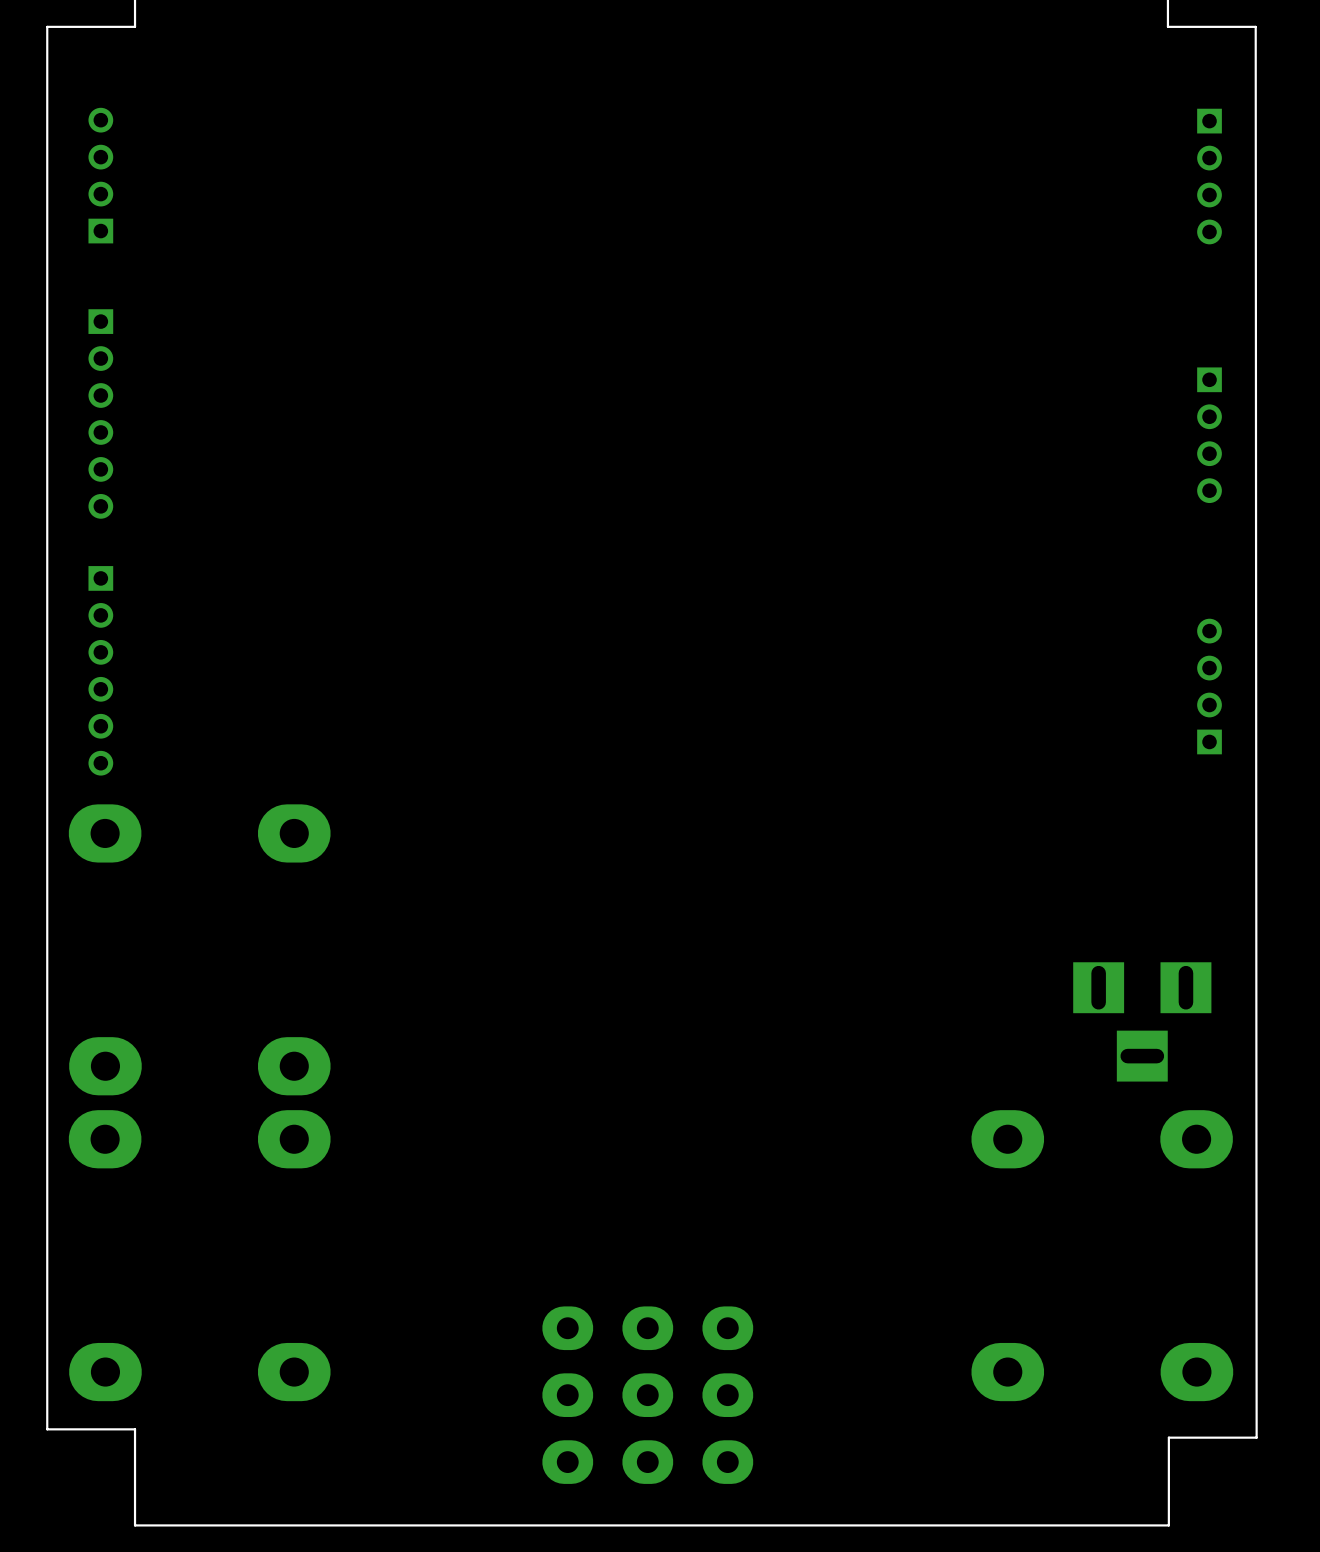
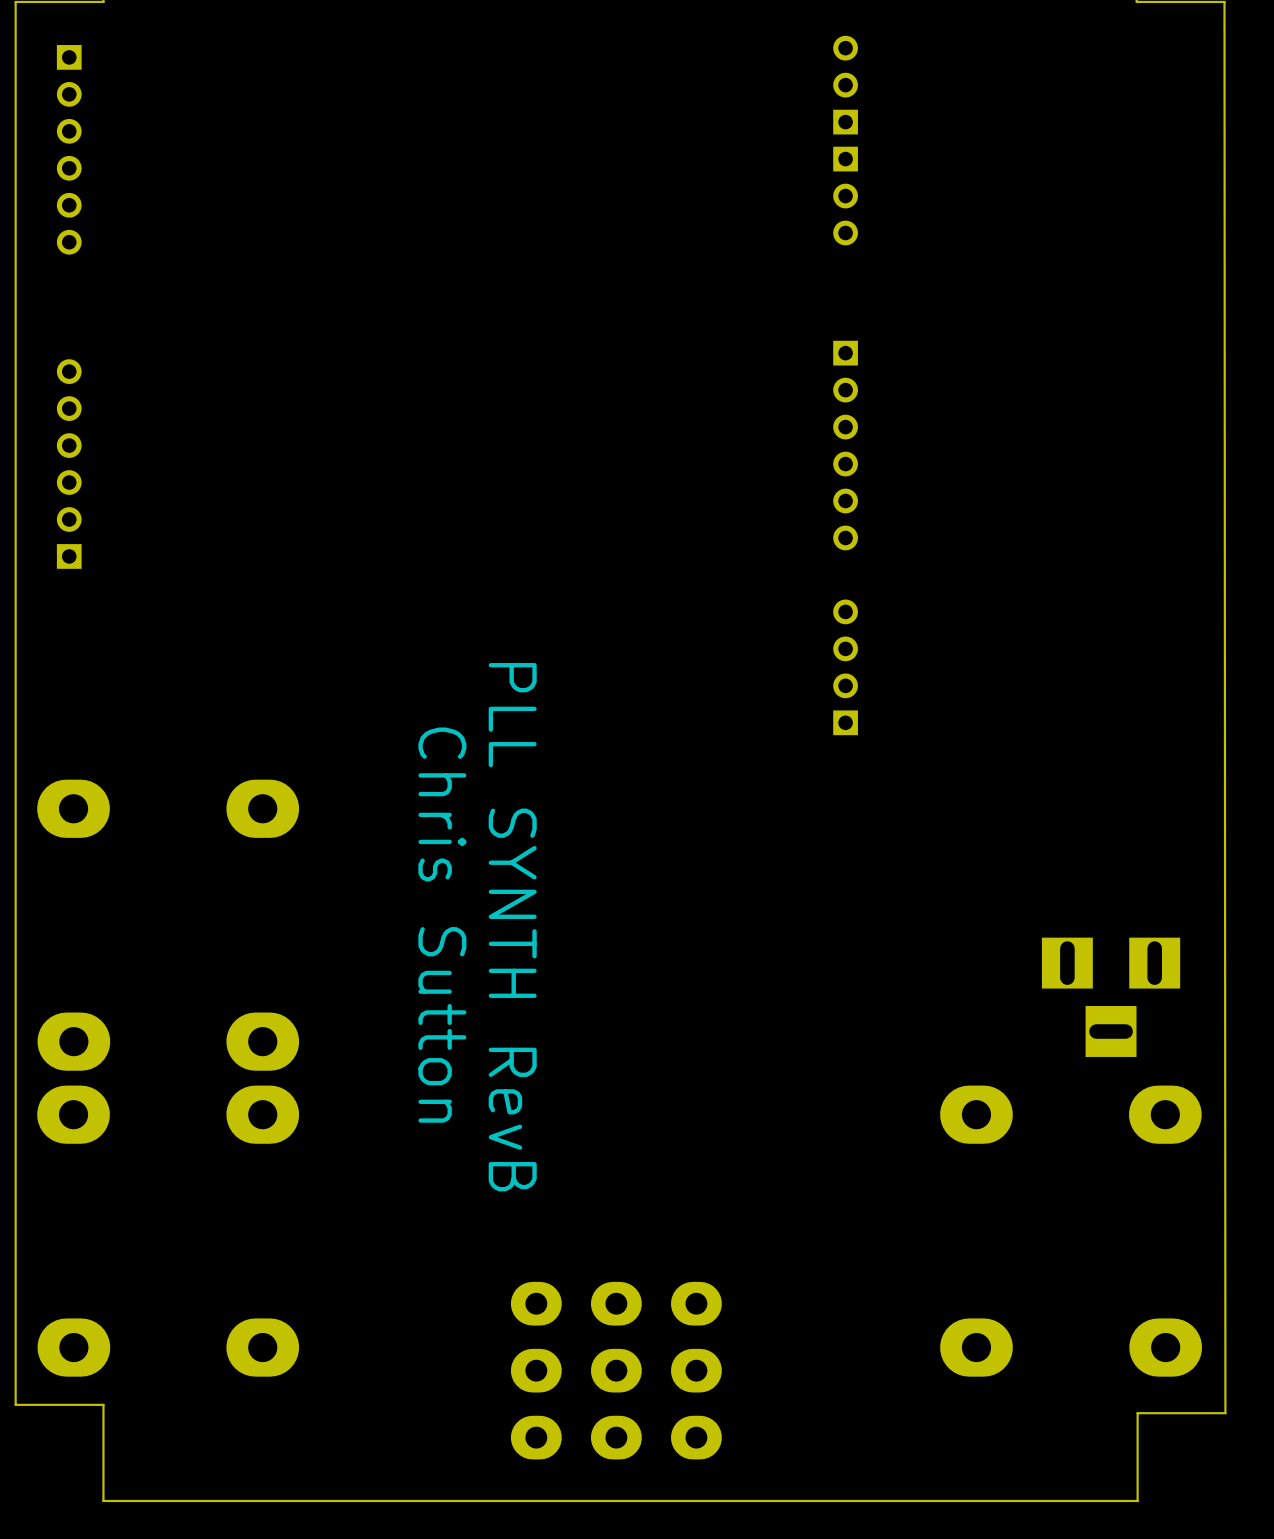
part footprint: [88, 107, 114, 244] -> [56, 45, 82, 255]
part: none -> (845, 85)
part: (1209, 176) -> none
part: none -> (845, 196)
part rotation: 0° (100, 413) -> 180° (69, 464)
part: (1209, 435) -> none
part: none -> (845, 445)
part: (100, 670) -> none
part: (1209, 686) -> none
part: none -> (845, 667)
text: none -> Chris Sutton (442, 925)
text: none -> PLL SYNTH RevB (512, 927)

